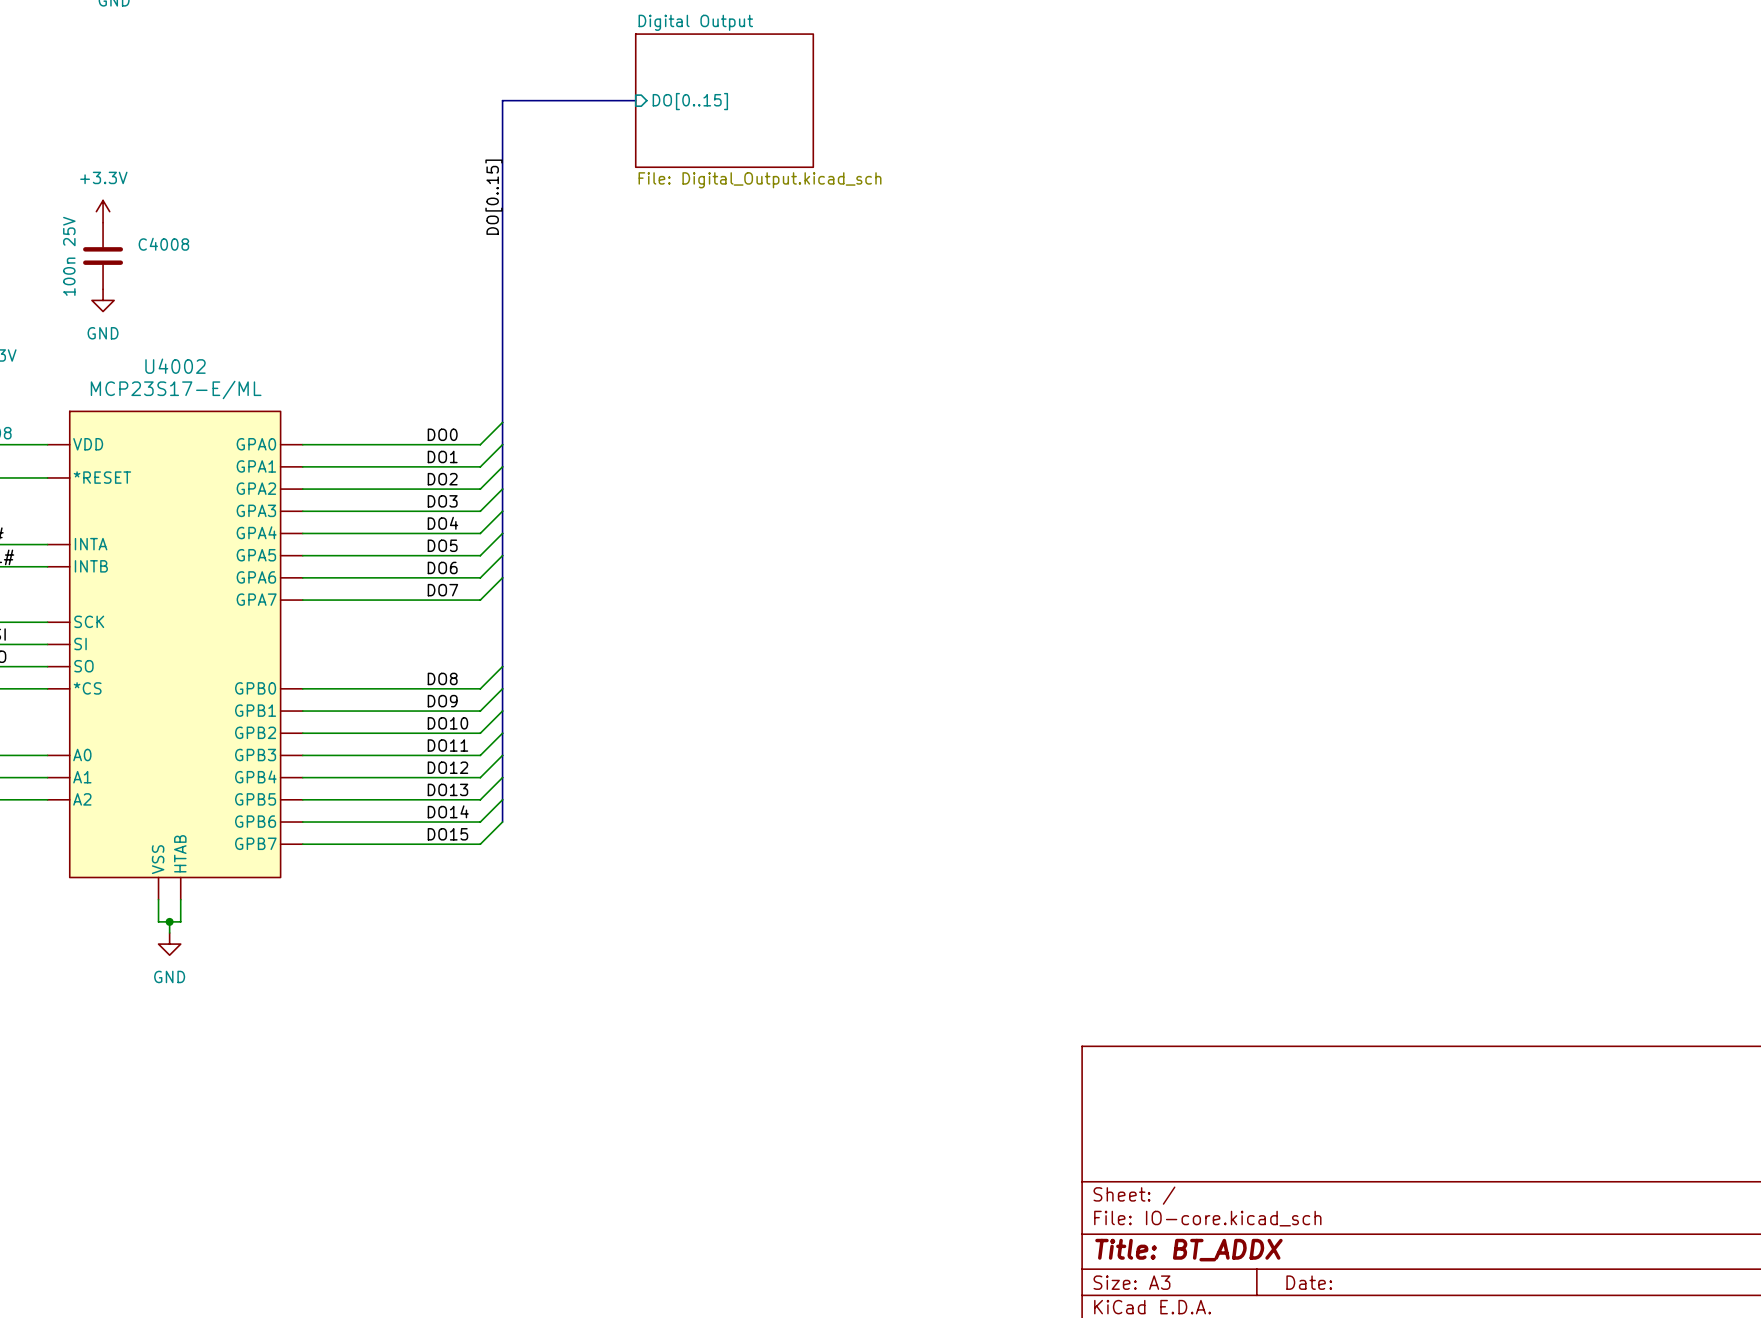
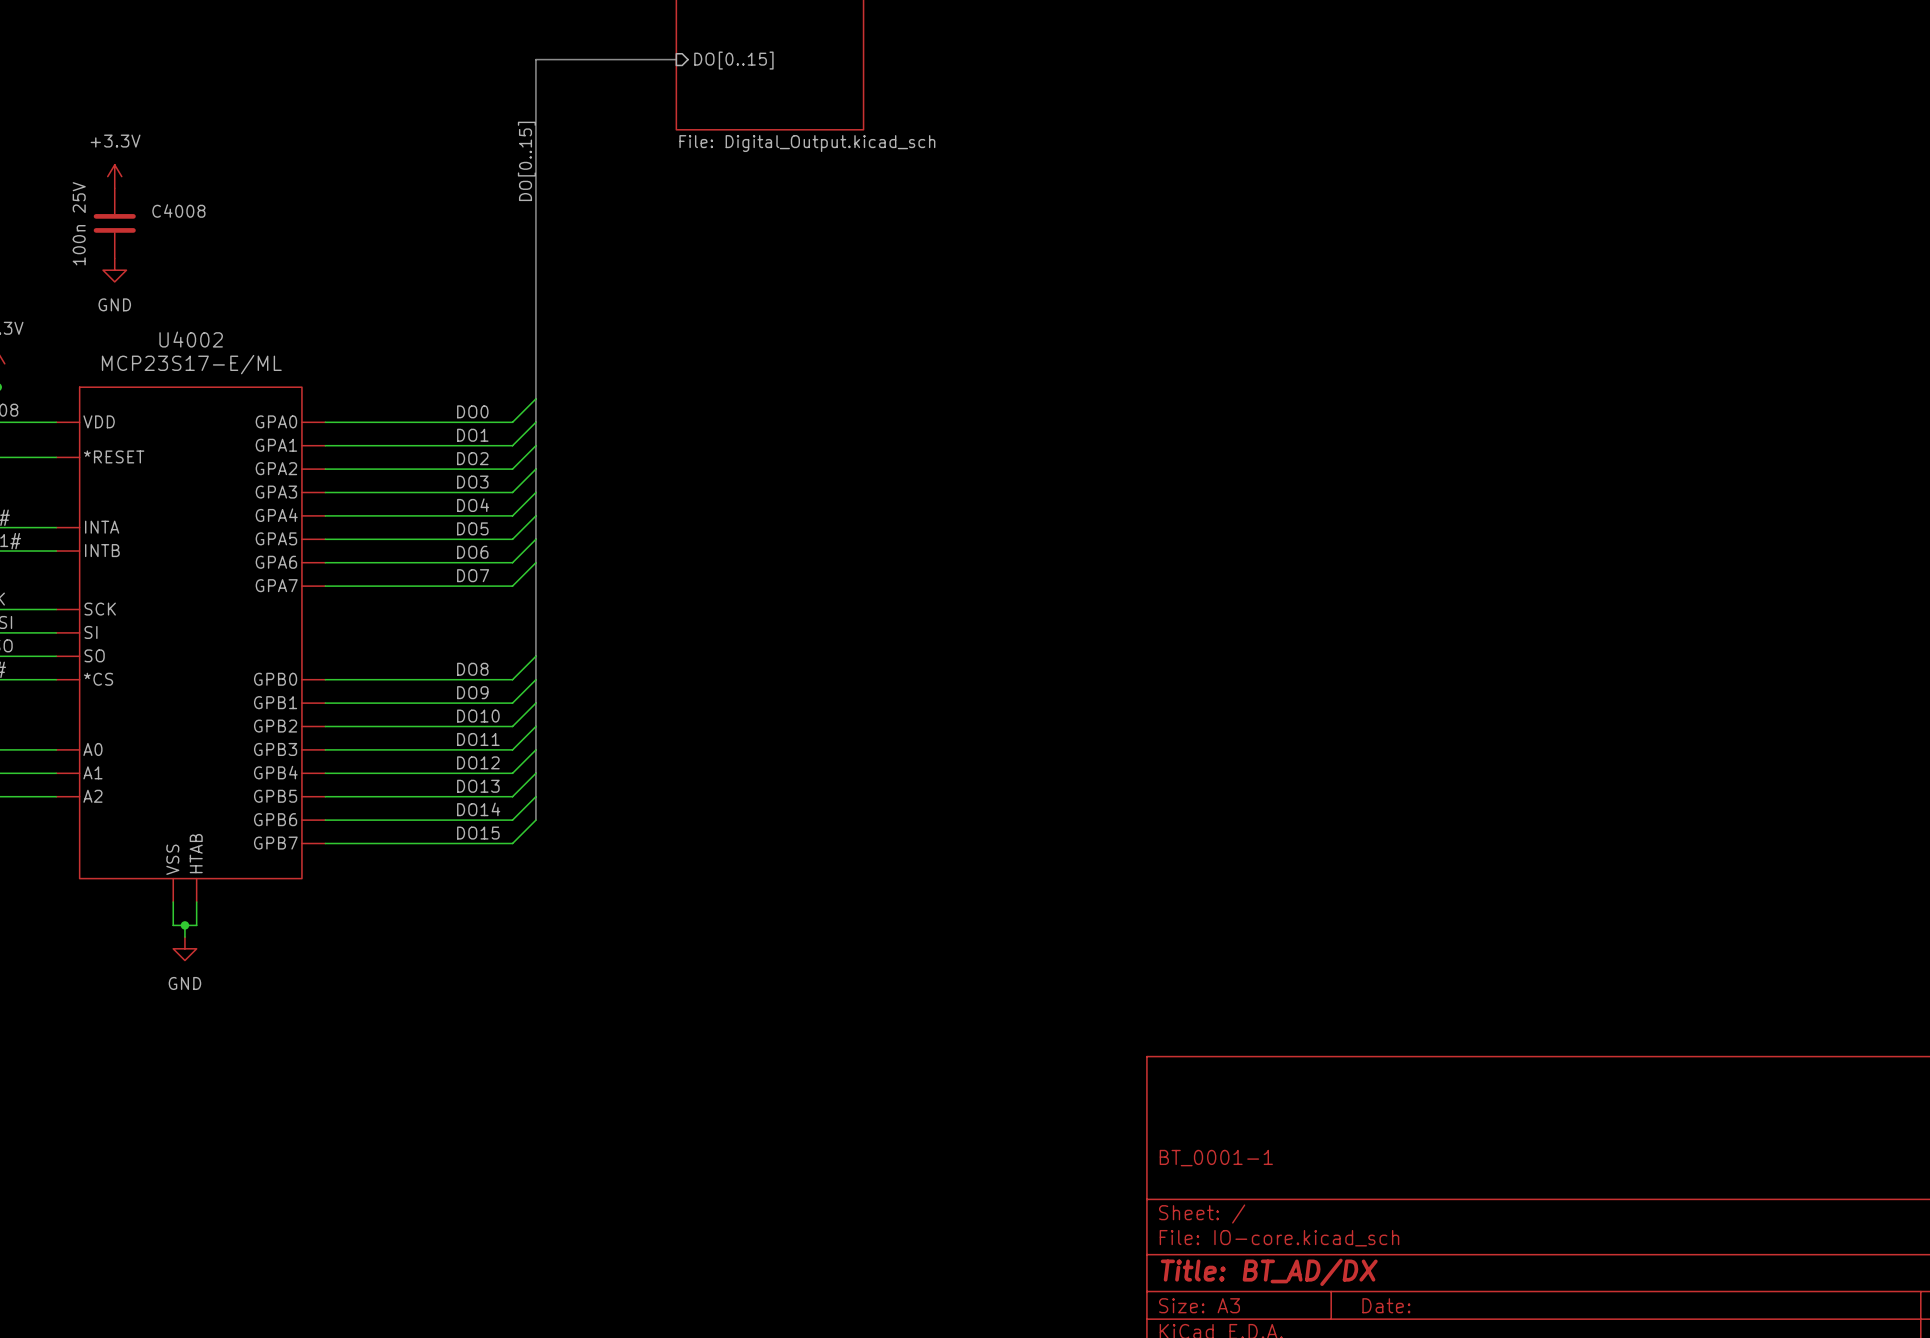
title block: none -> BT_0001-1 (1216, 1158)
title block: Title: BT_ADDX (1188, 1250) -> Title: BT_AD/DX (1269, 1272)

